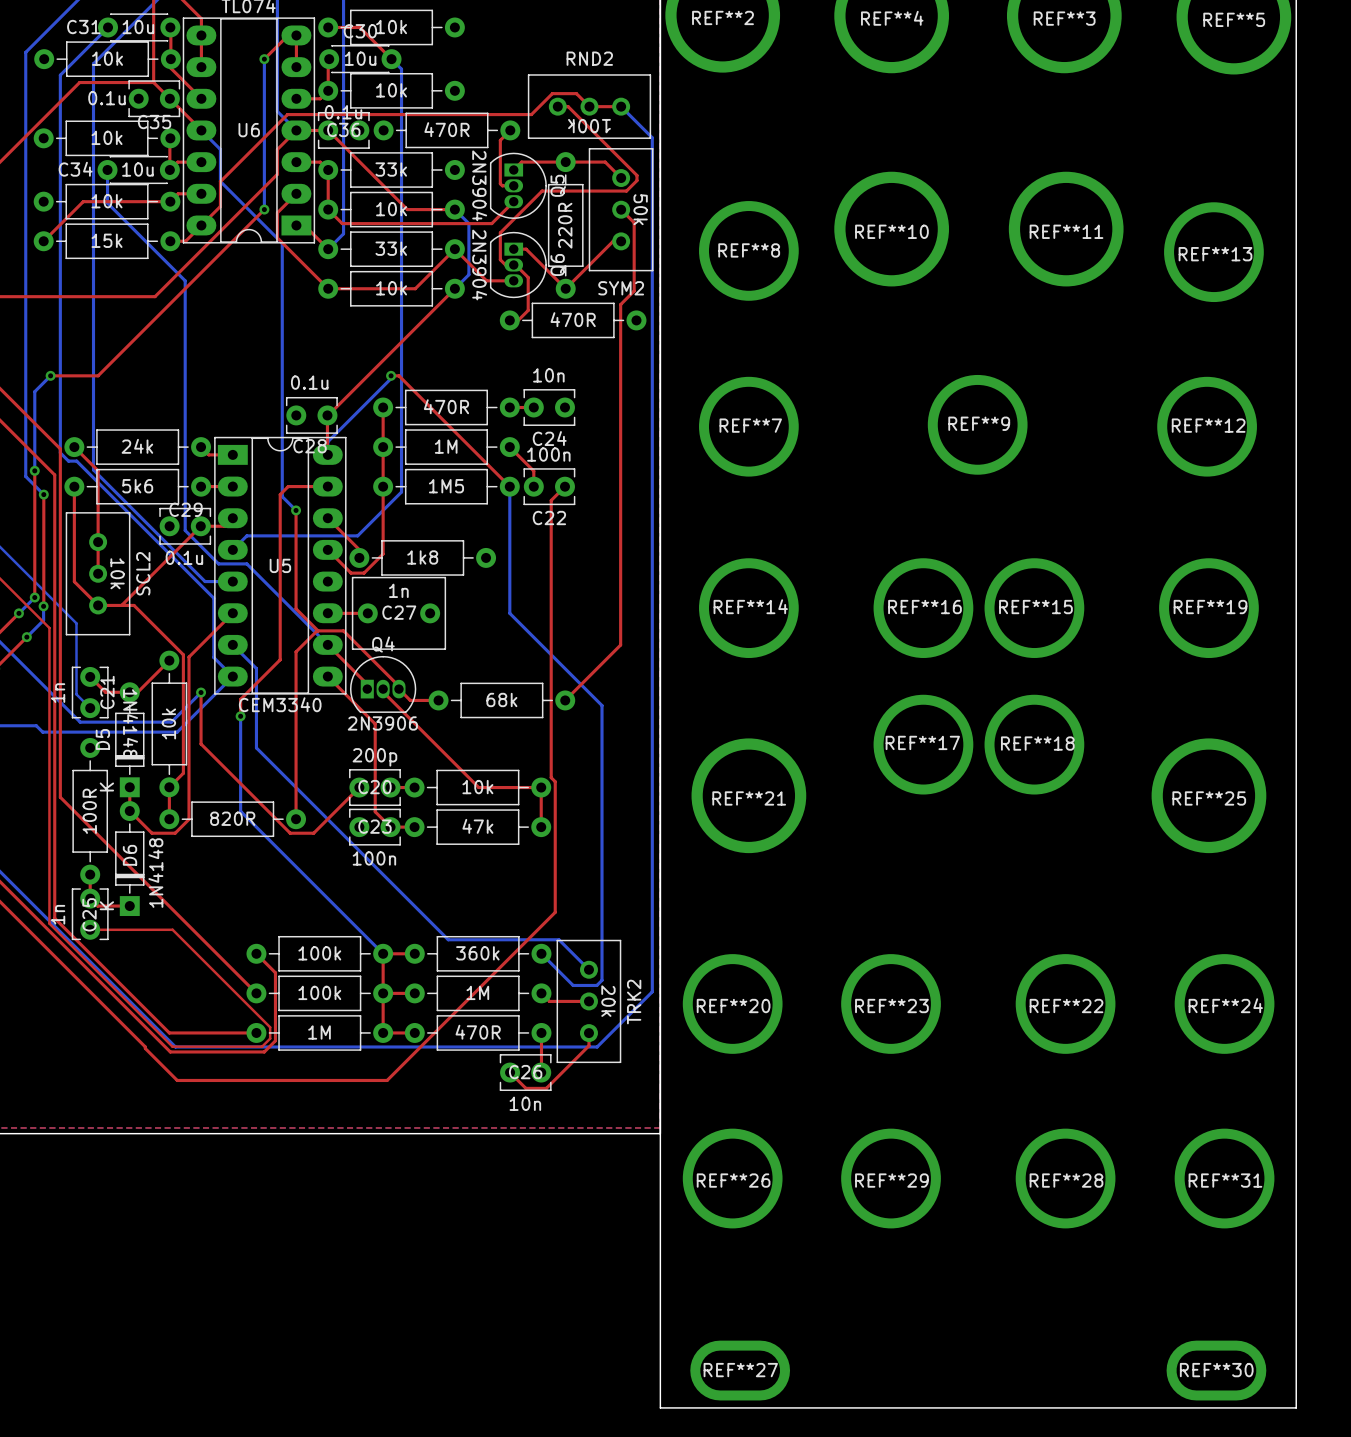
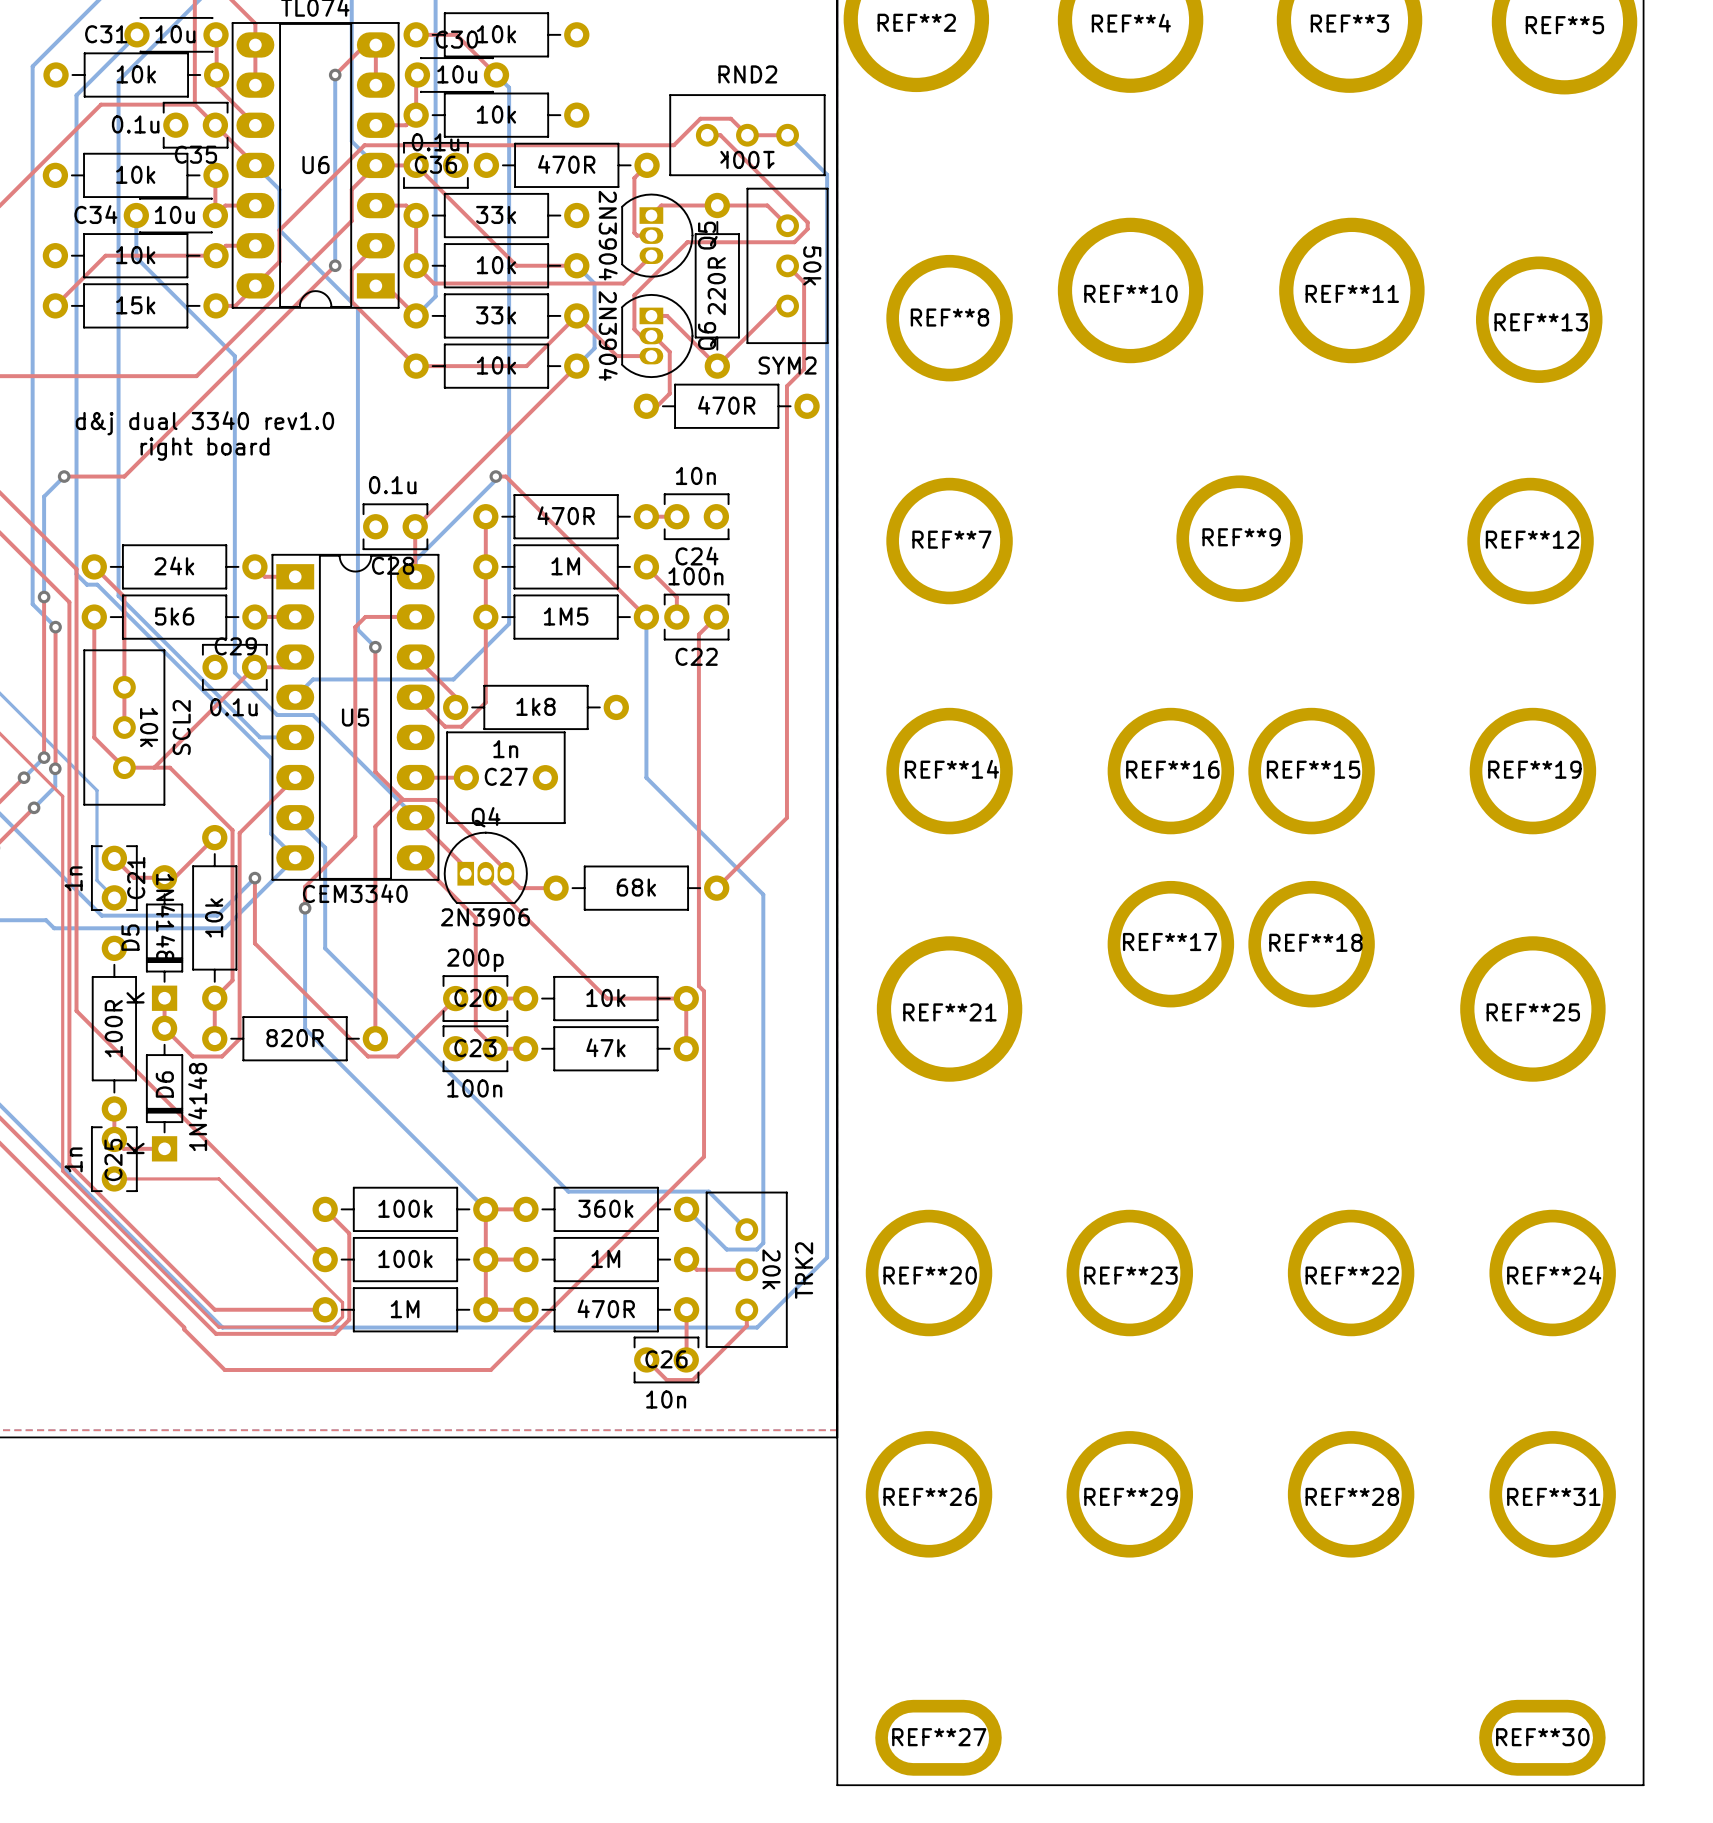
text: none -> d&j dual 3340 rev1.0 (204, 423)
text: none -> right board (204, 449)

